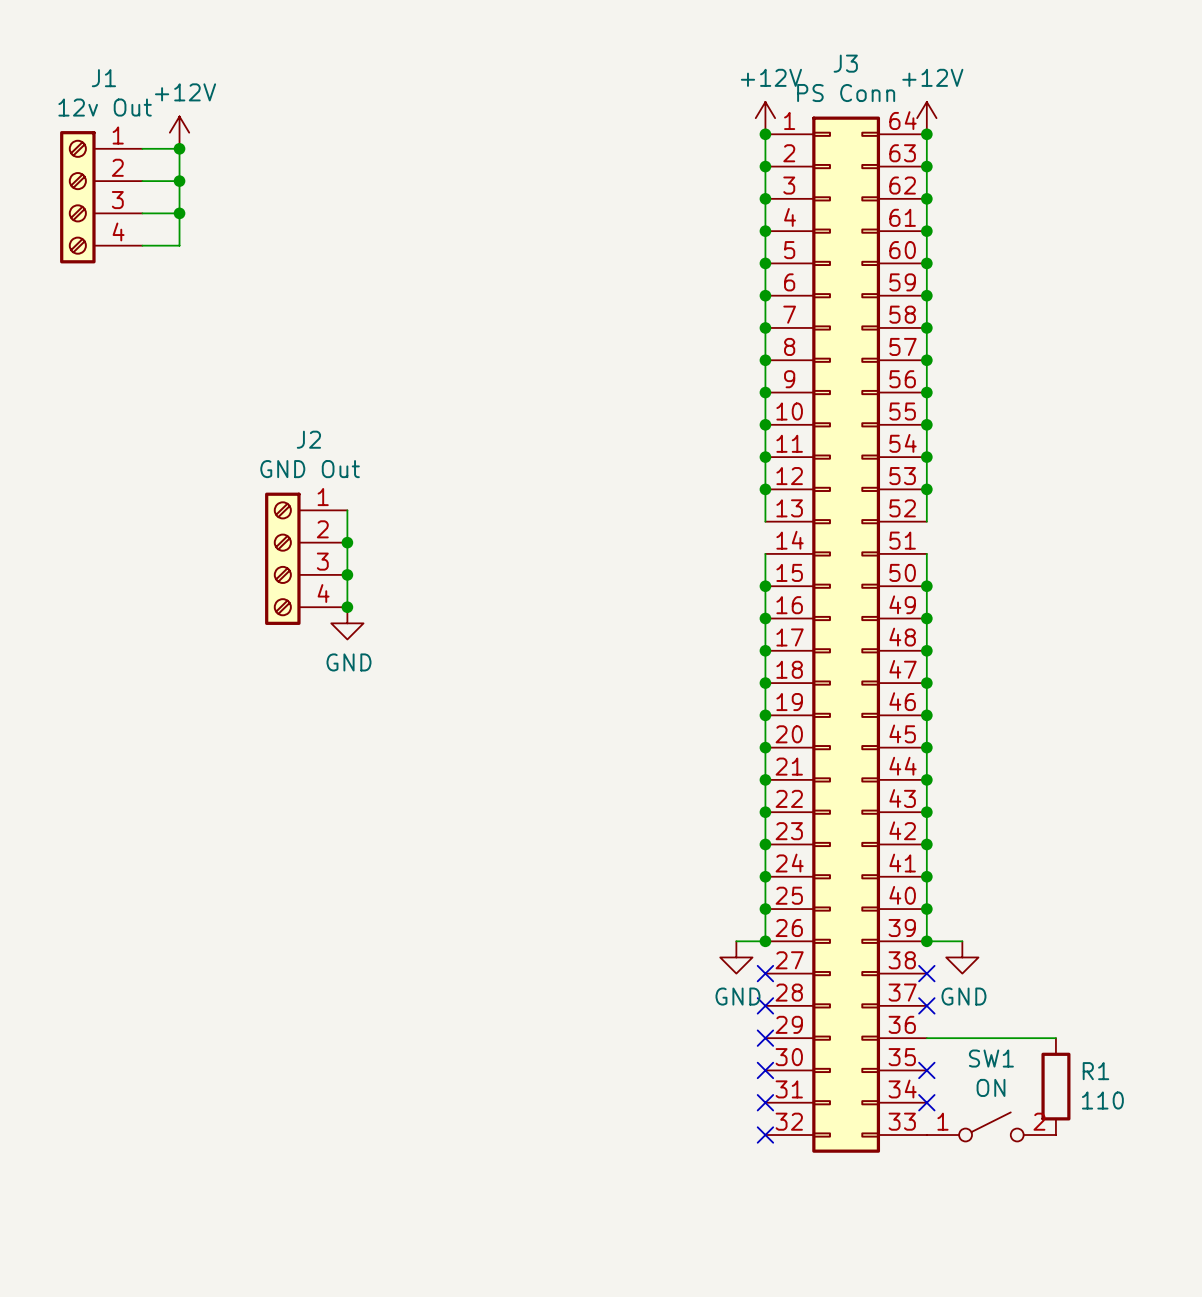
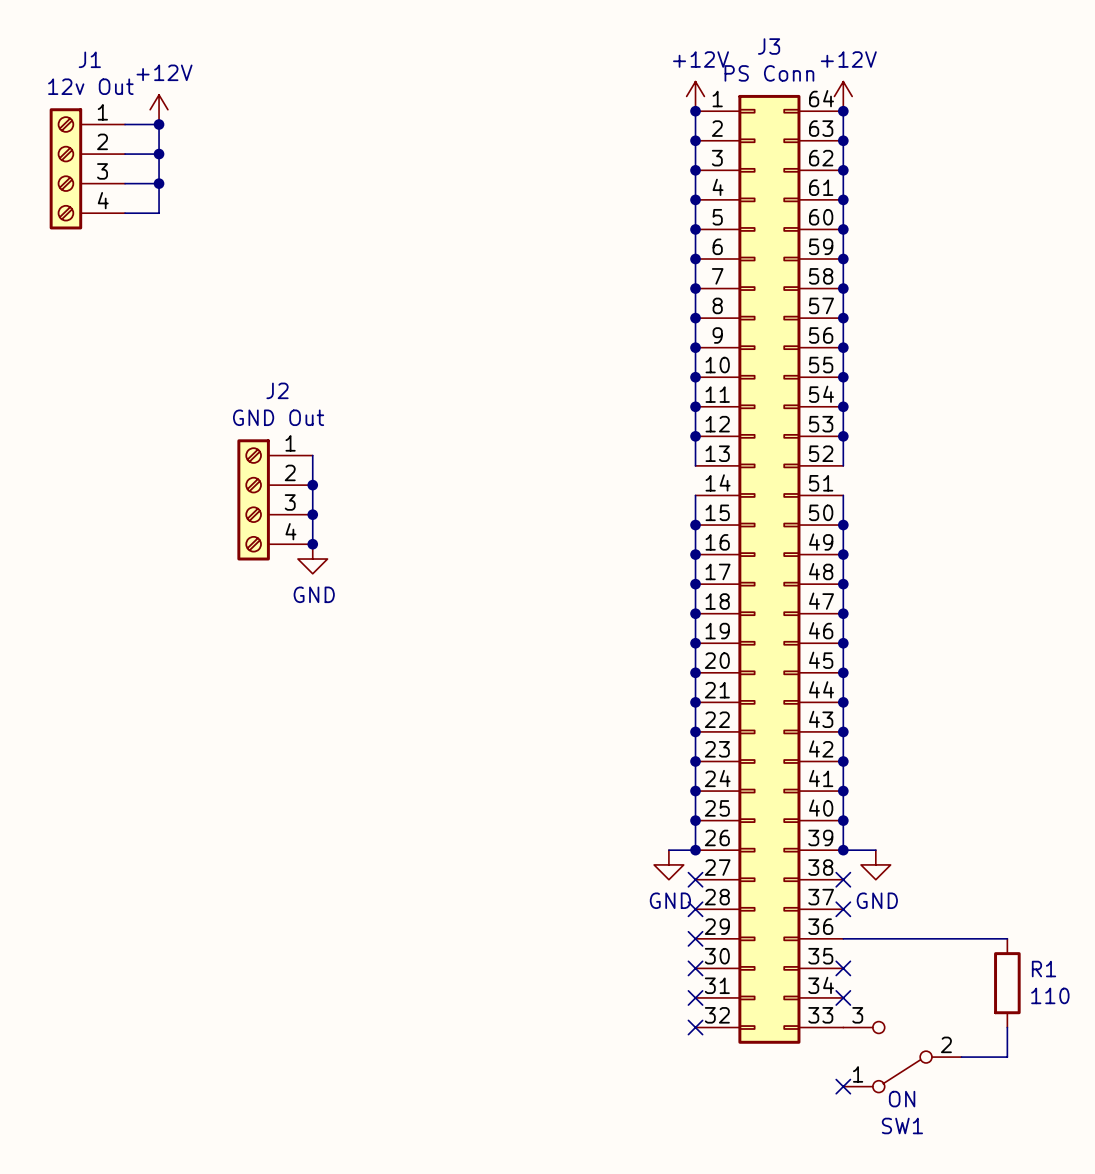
wire: none -> (961, 938) (1007, 938)
SW1 name position: SW1 (991, 1058) -> SW1 (902, 1125)
R1 position: (1055, 1086) -> (1007, 983)
SW1 value position: ON (991, 1087) -> ON (902, 1099)
SW1 symbol: [926, 1112, 1056, 1142] -> [843, 1021, 962, 1093]
wire: none -> (1007, 1027) (1007, 1057) (961, 1057)
no-connect mark: none -> (843, 1086)

